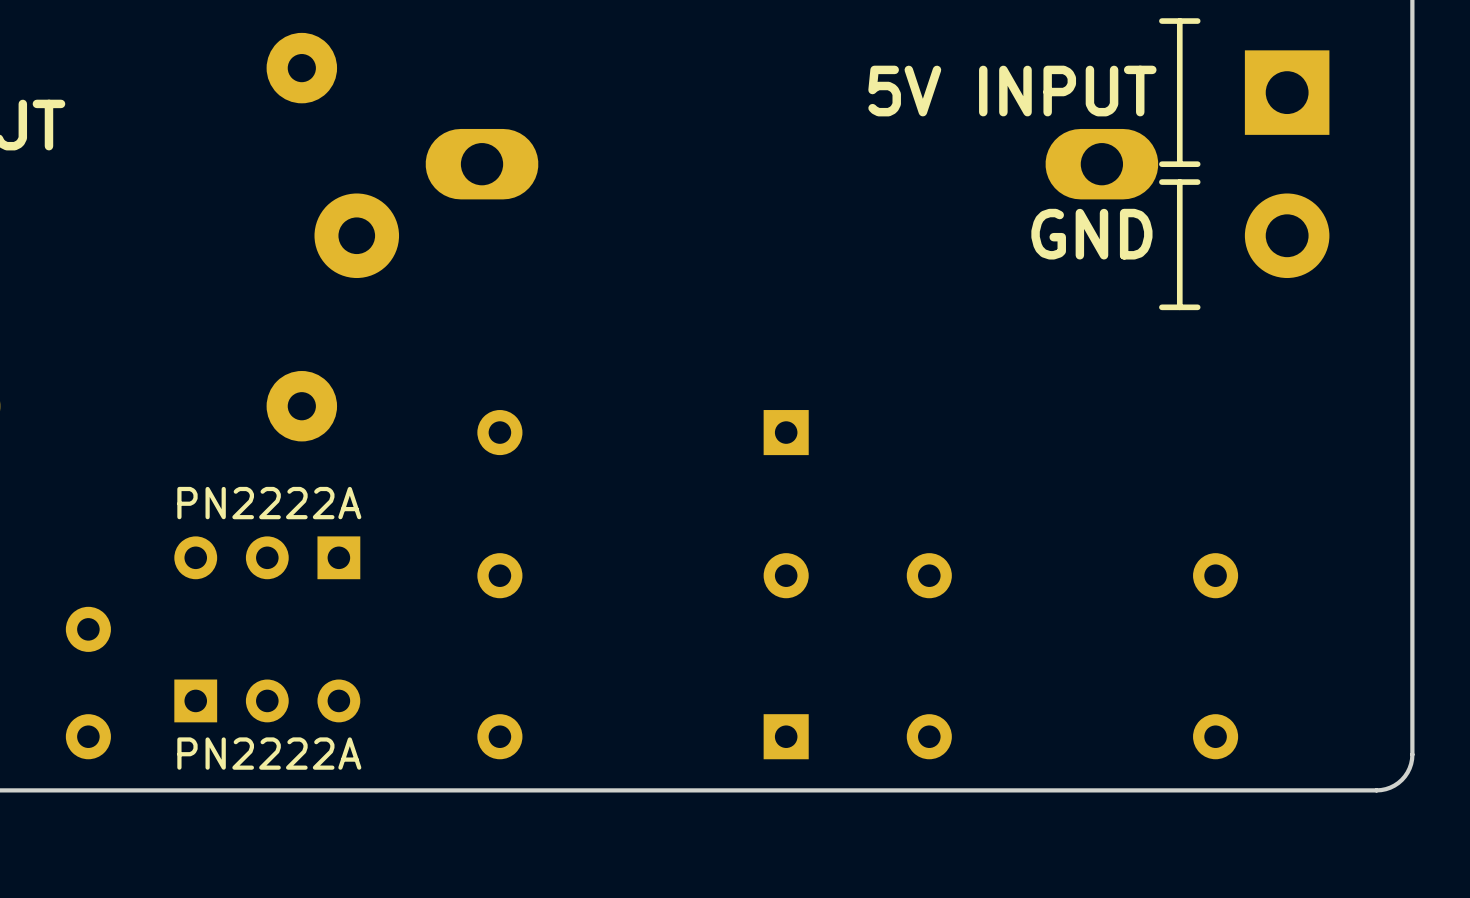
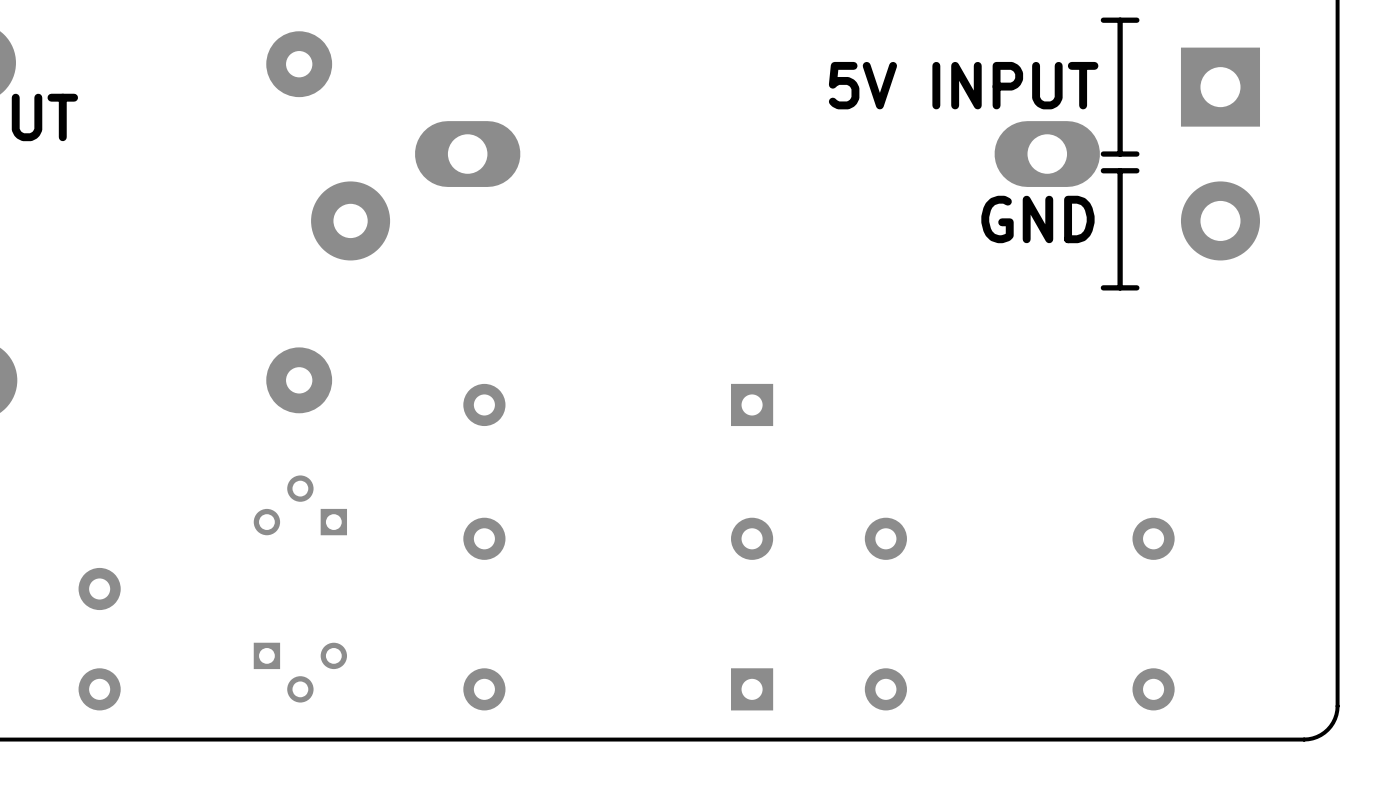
part: none -> (300, 505)
part: PN2222A (267, 557) -> none
part: PN2222A (267, 700) -> none
part: none -> (300, 672)

